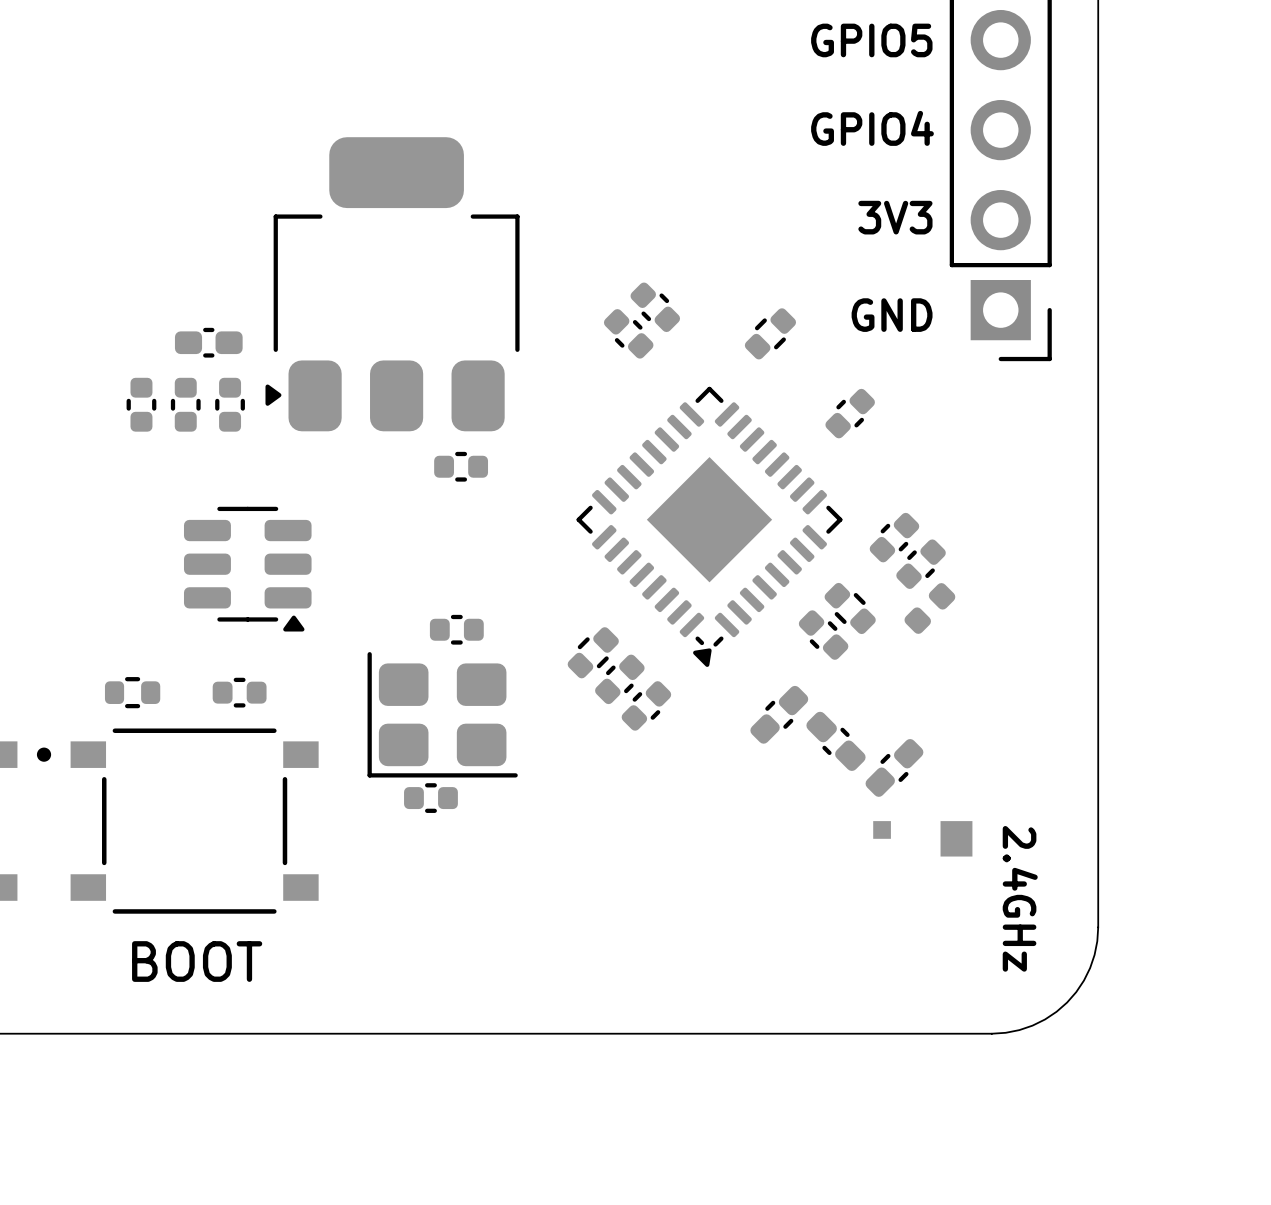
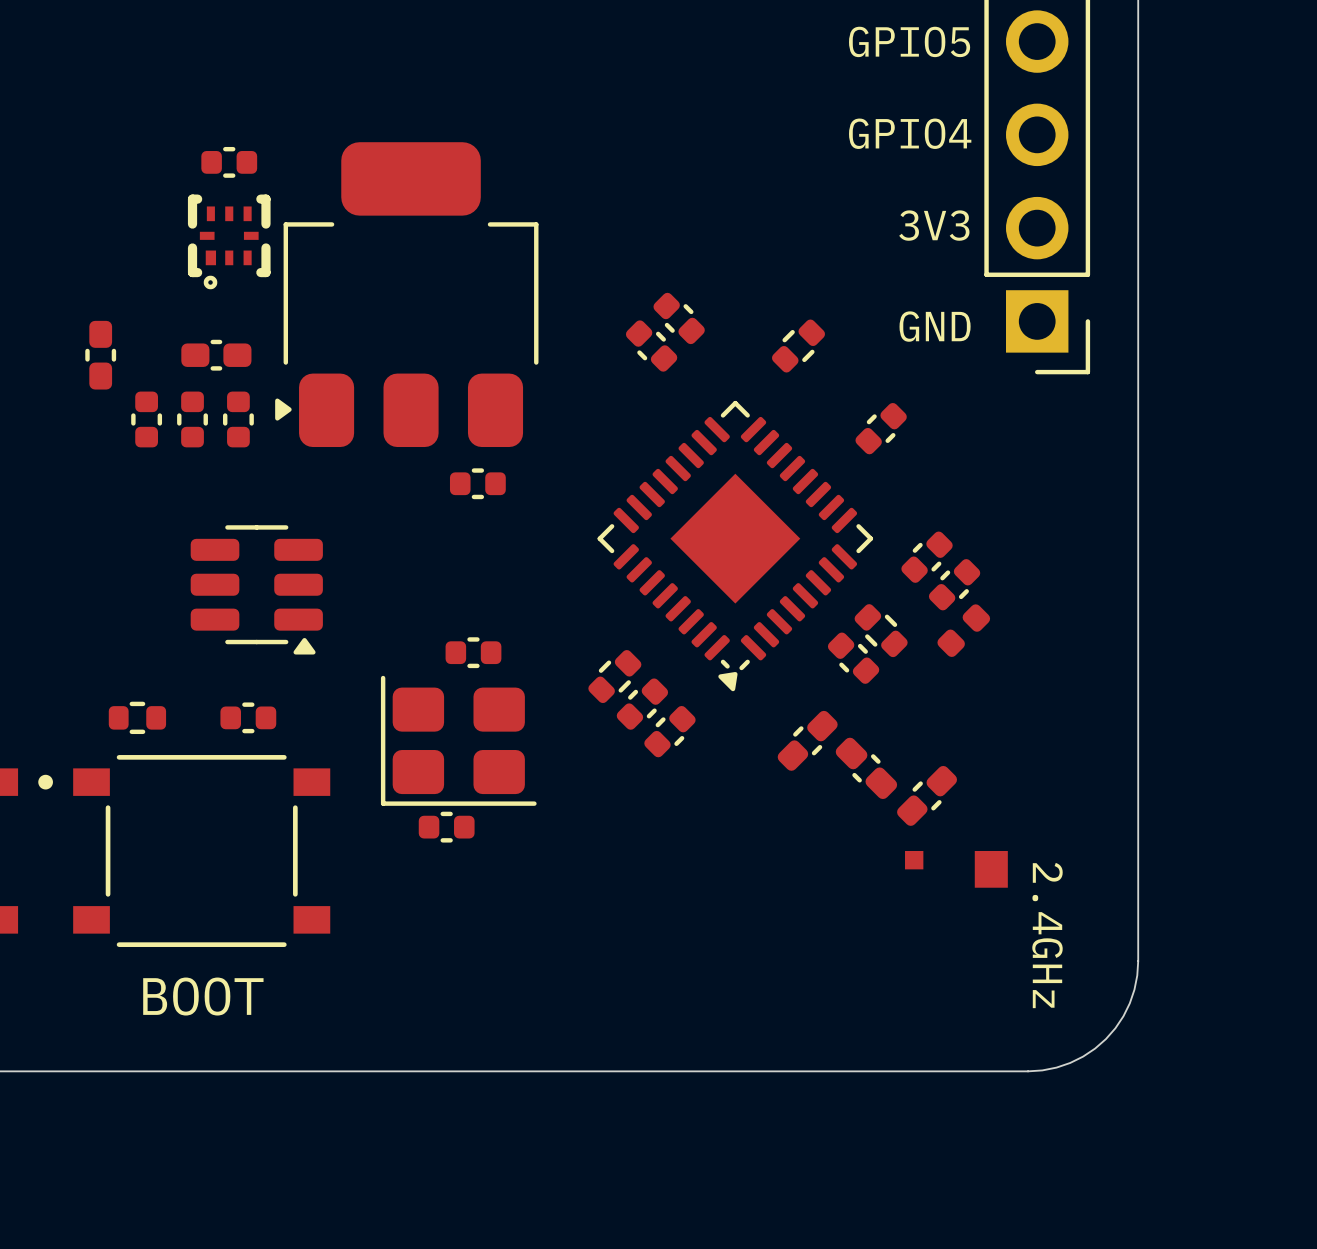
part: none -> (229, 162)
part: none -> (229, 241)
part: none -> (100, 355)
2.4GHz name: 2.4GHz (1020, 898) -> none
text: none -> 2.4GHz (1047, 935)

